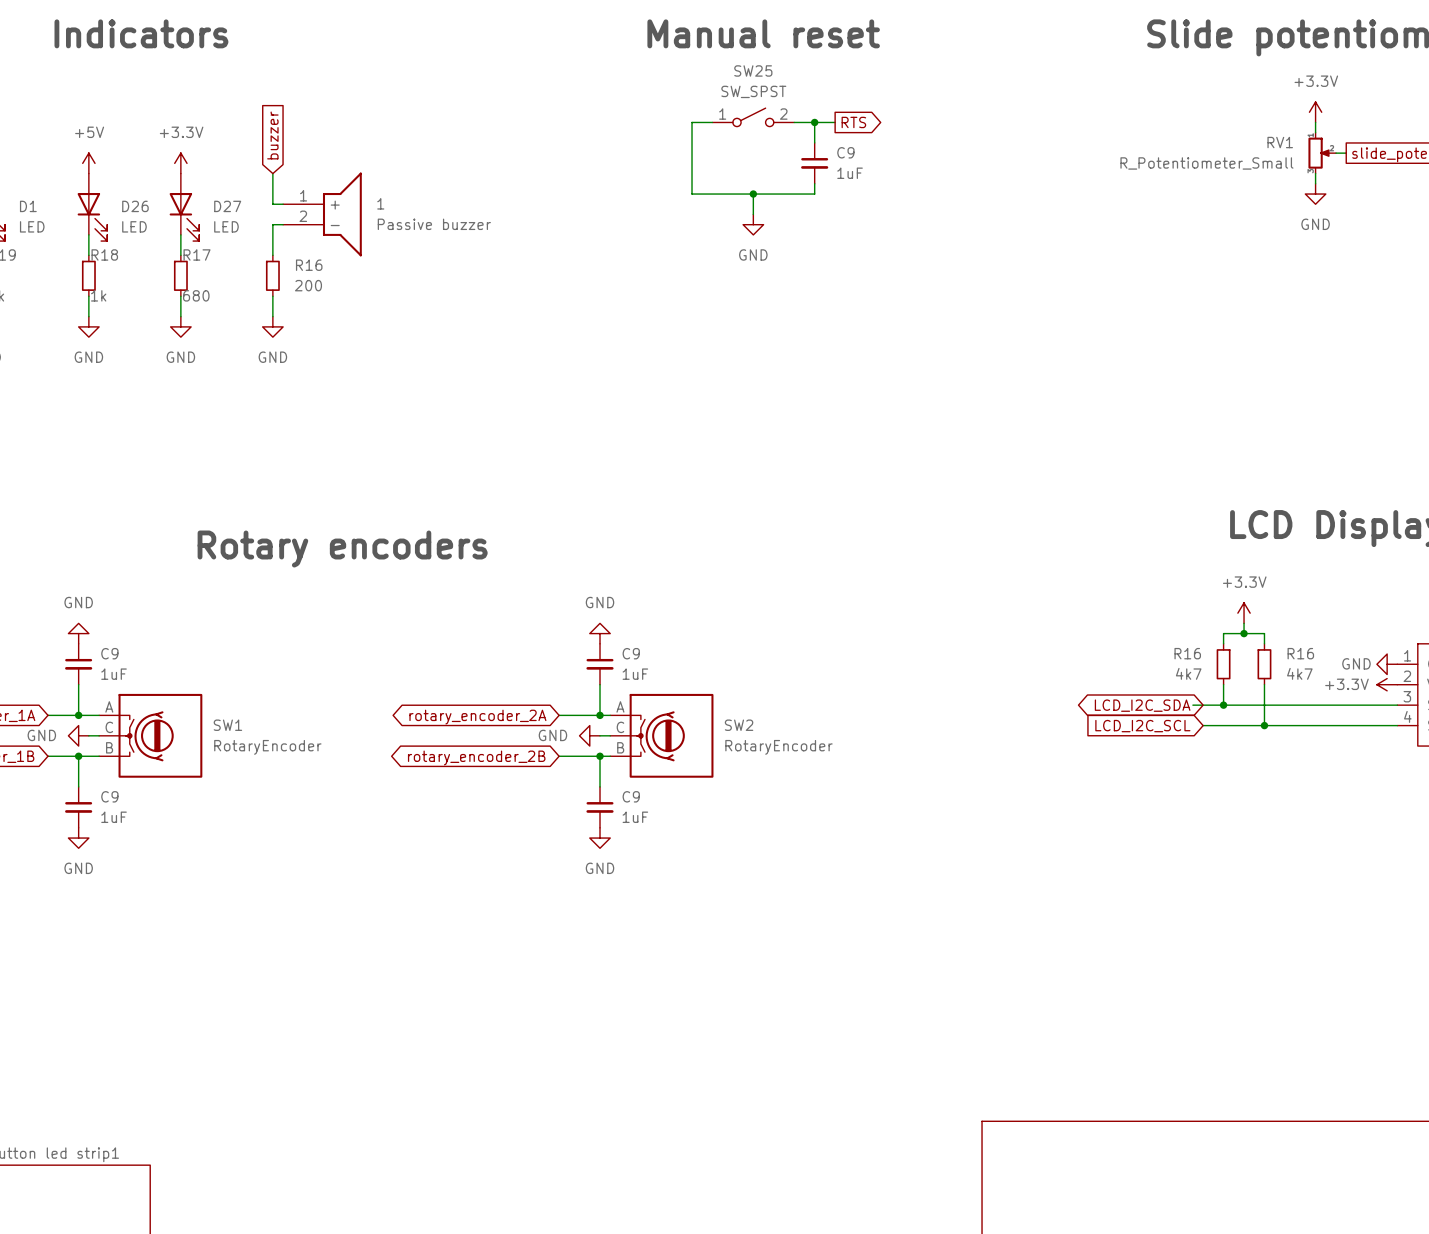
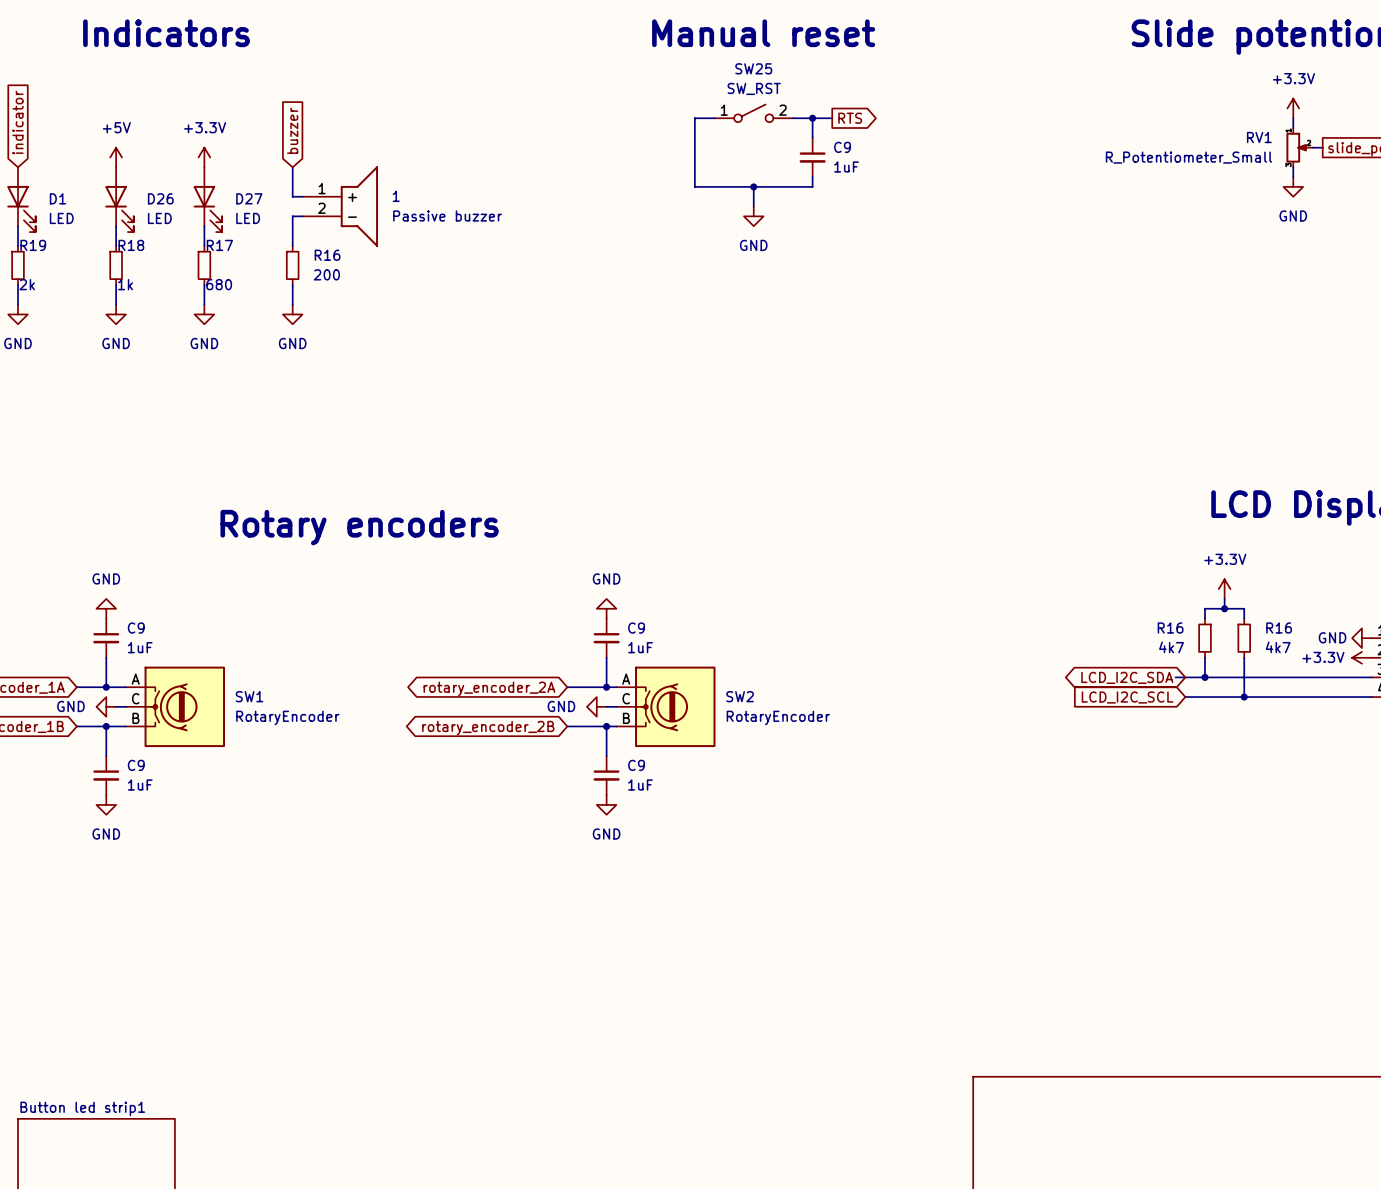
SW25 value: SW_SPST (753, 91) -> SW_RST (754, 88)

